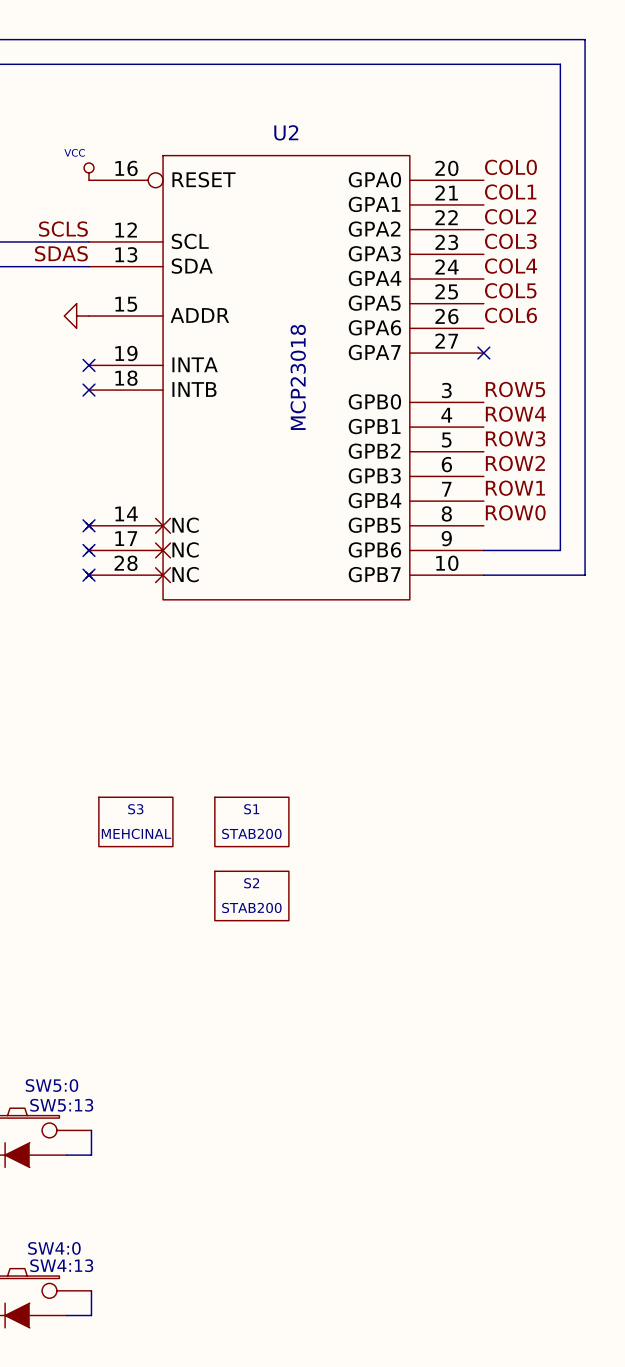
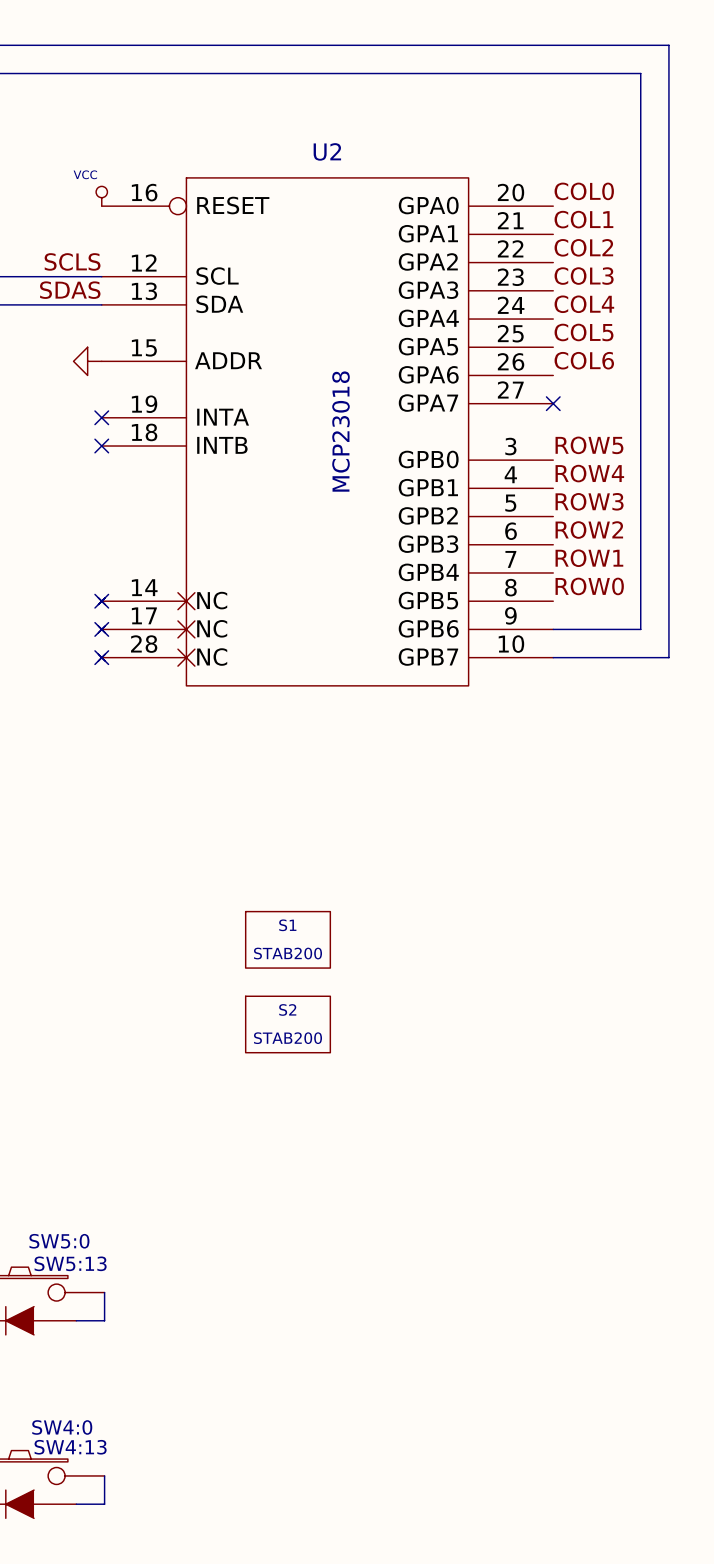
S3: MEHCINAL (135, 821) -> none

